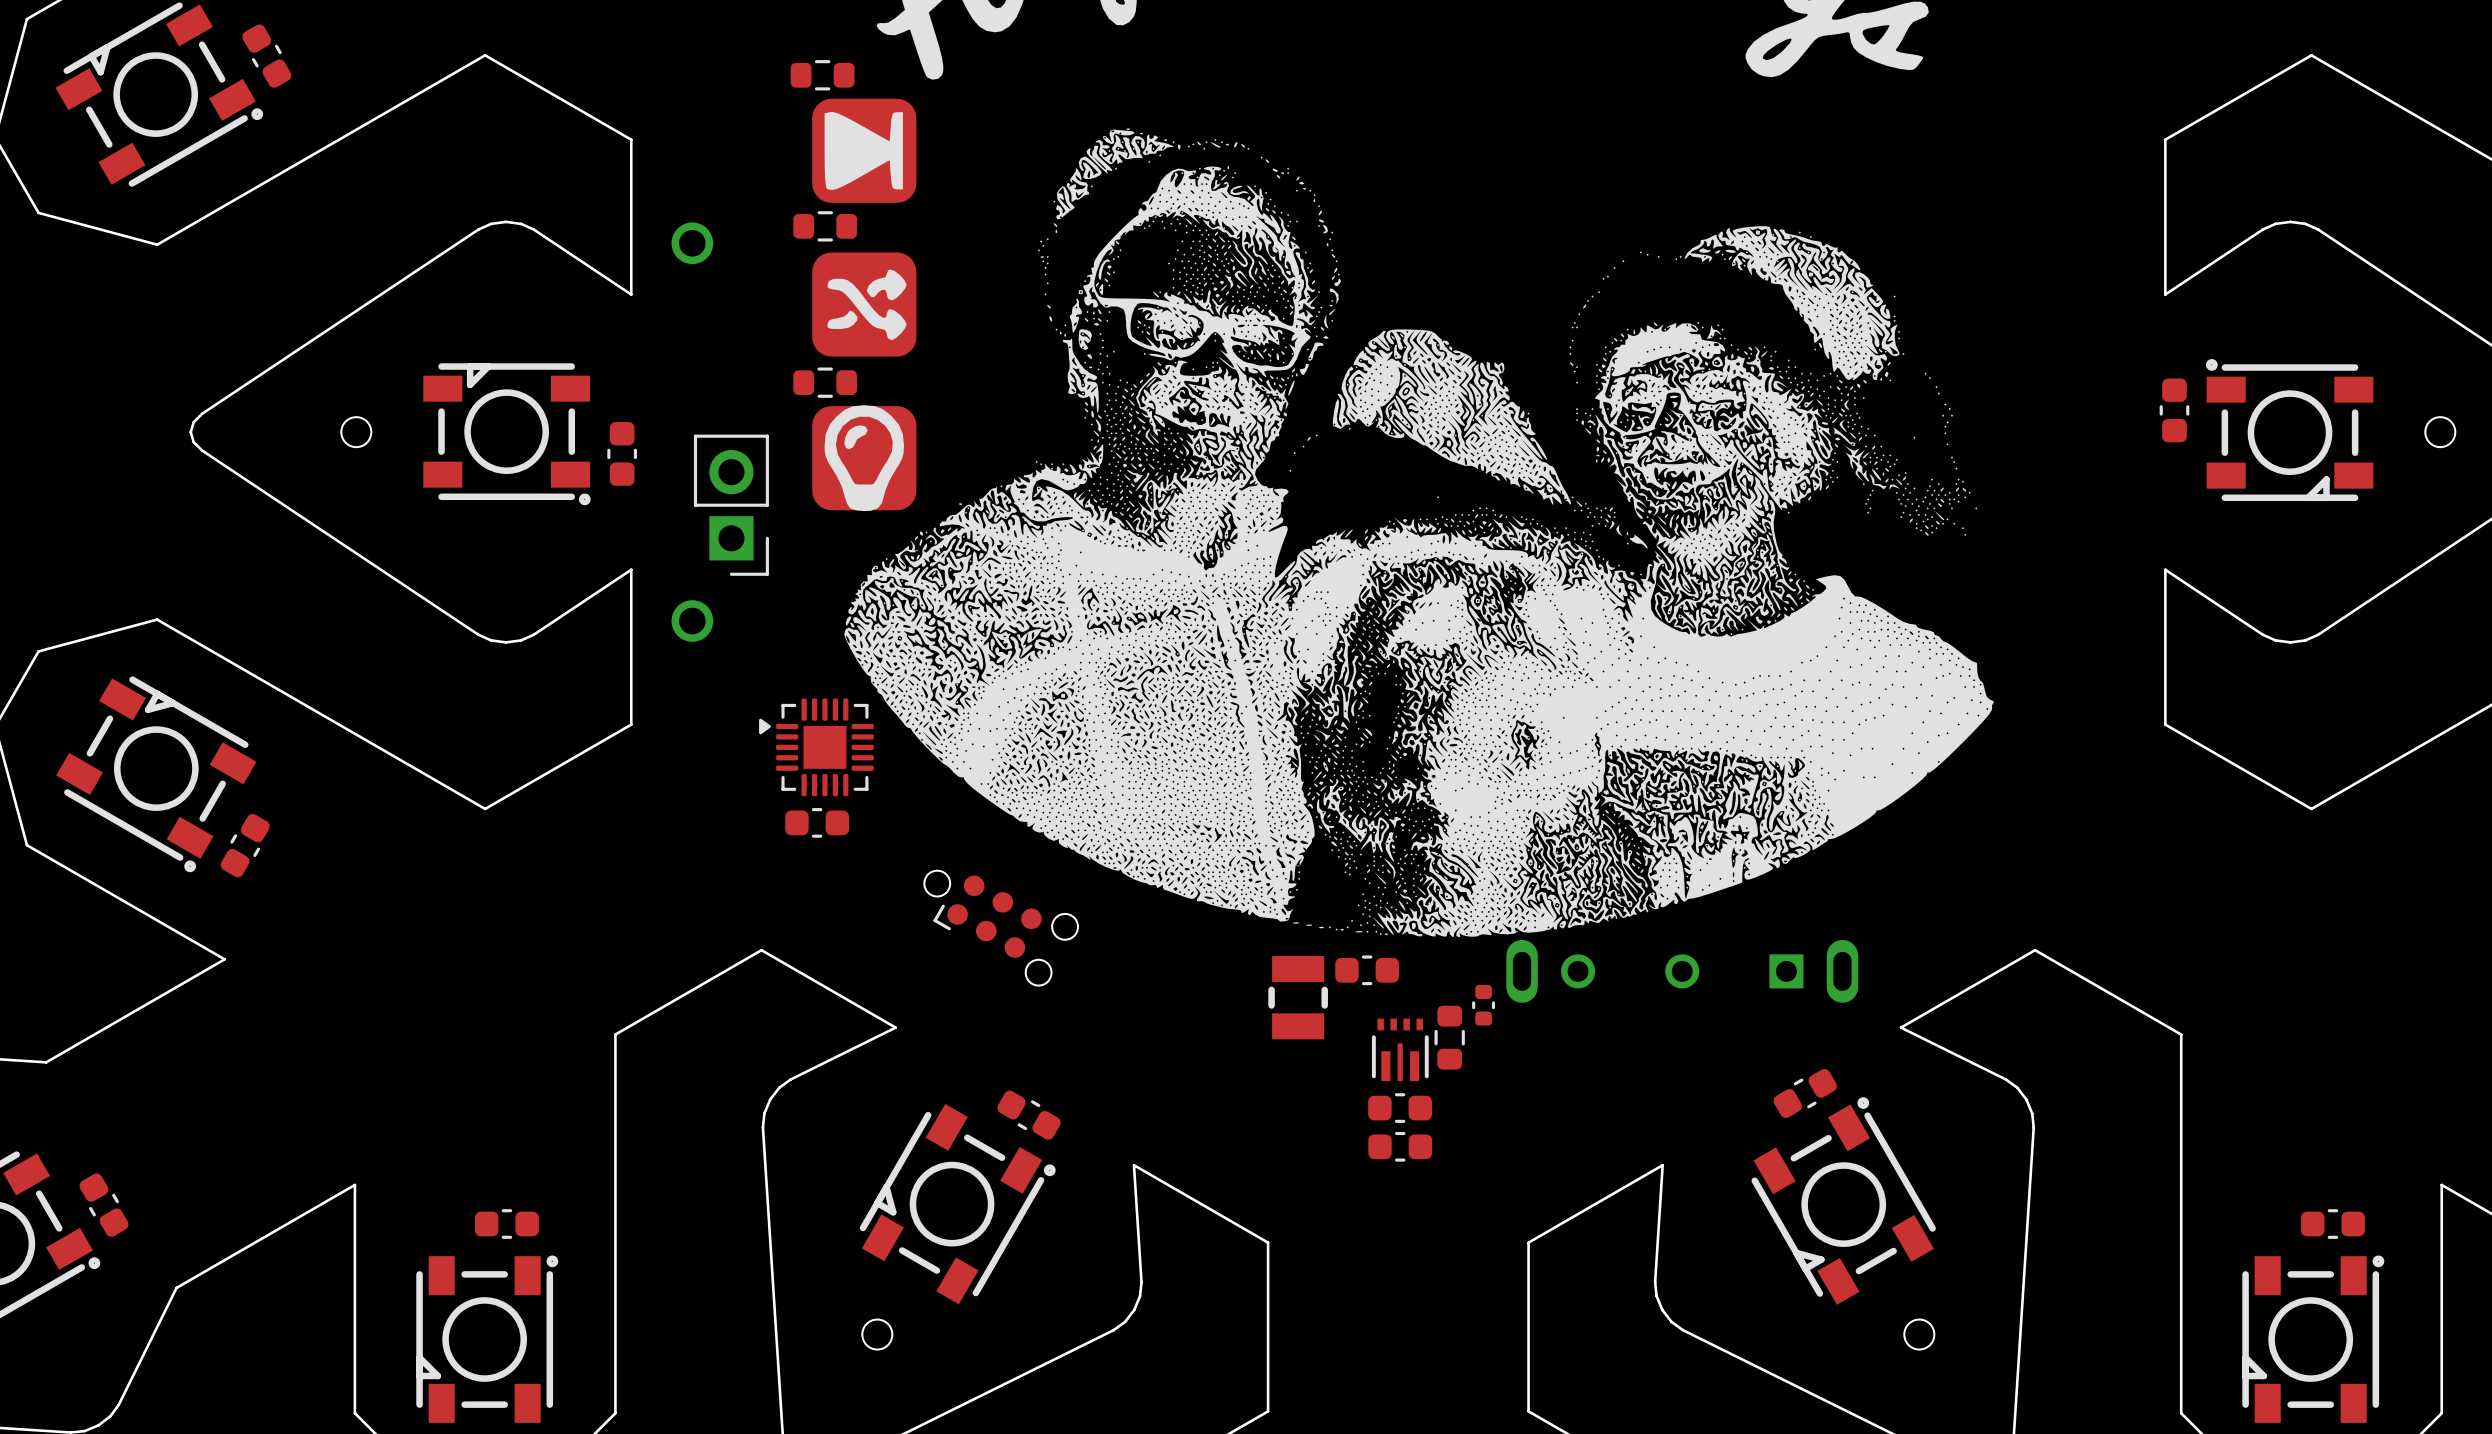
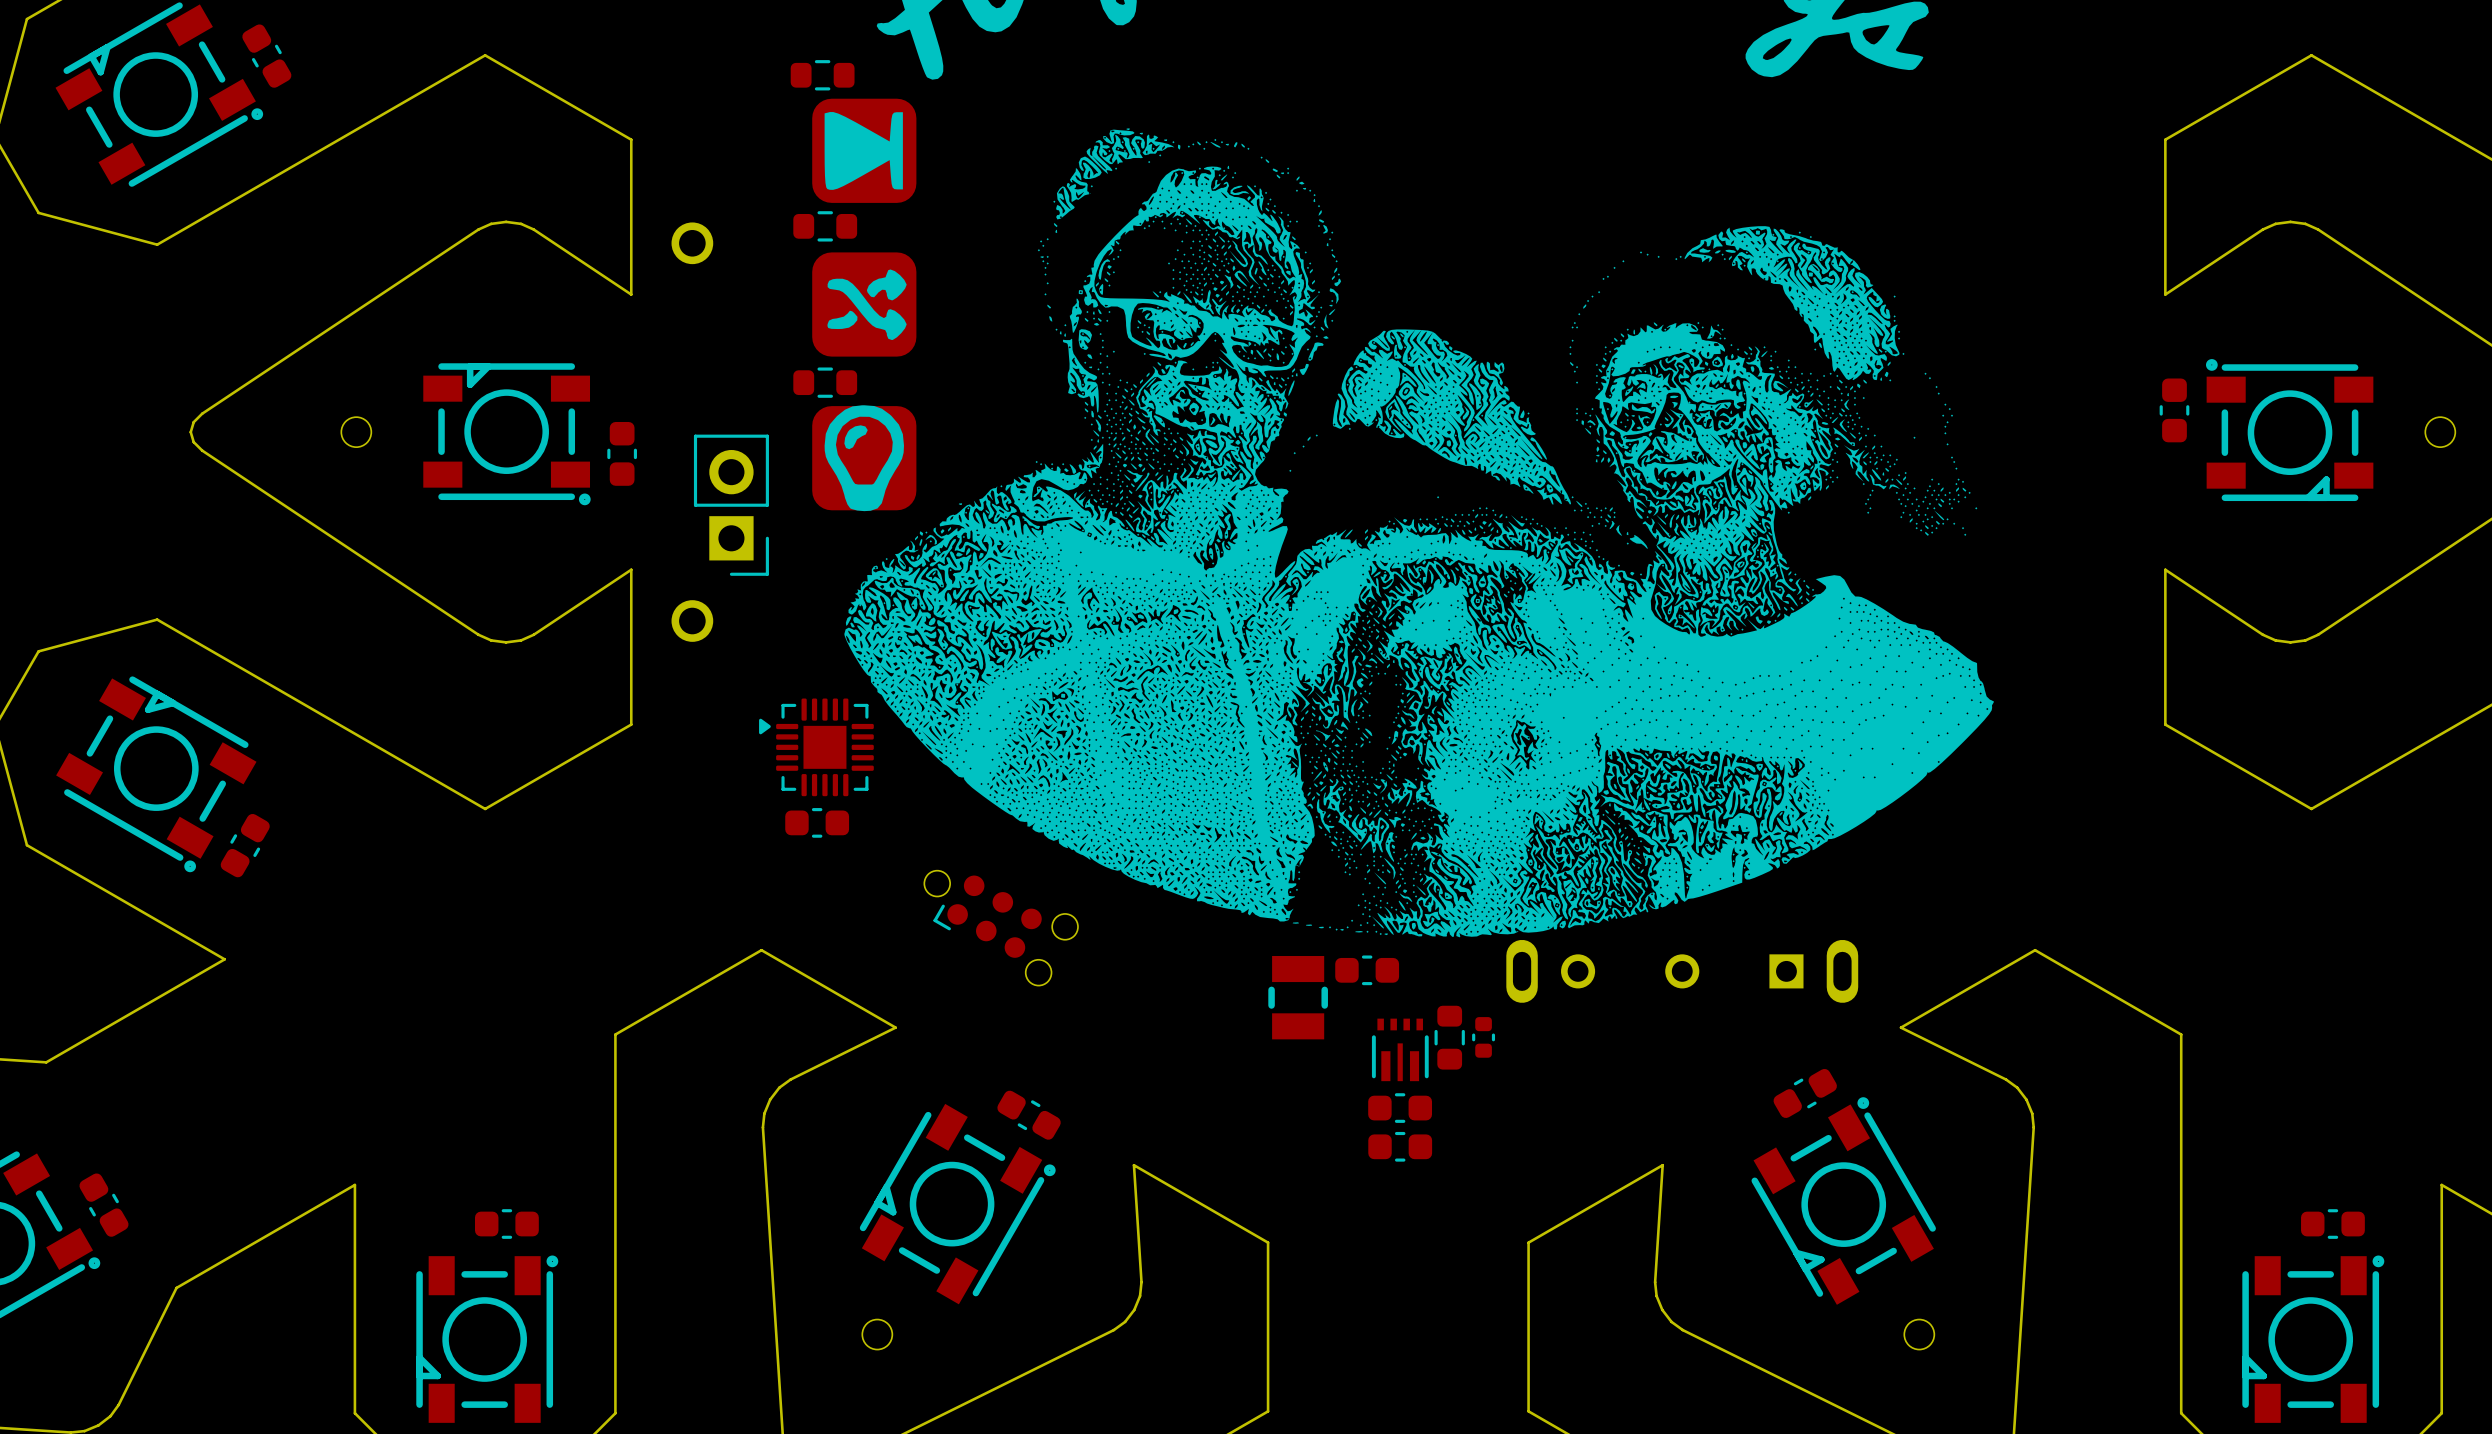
part position: (1483, 1005) -> (1483, 1037)

